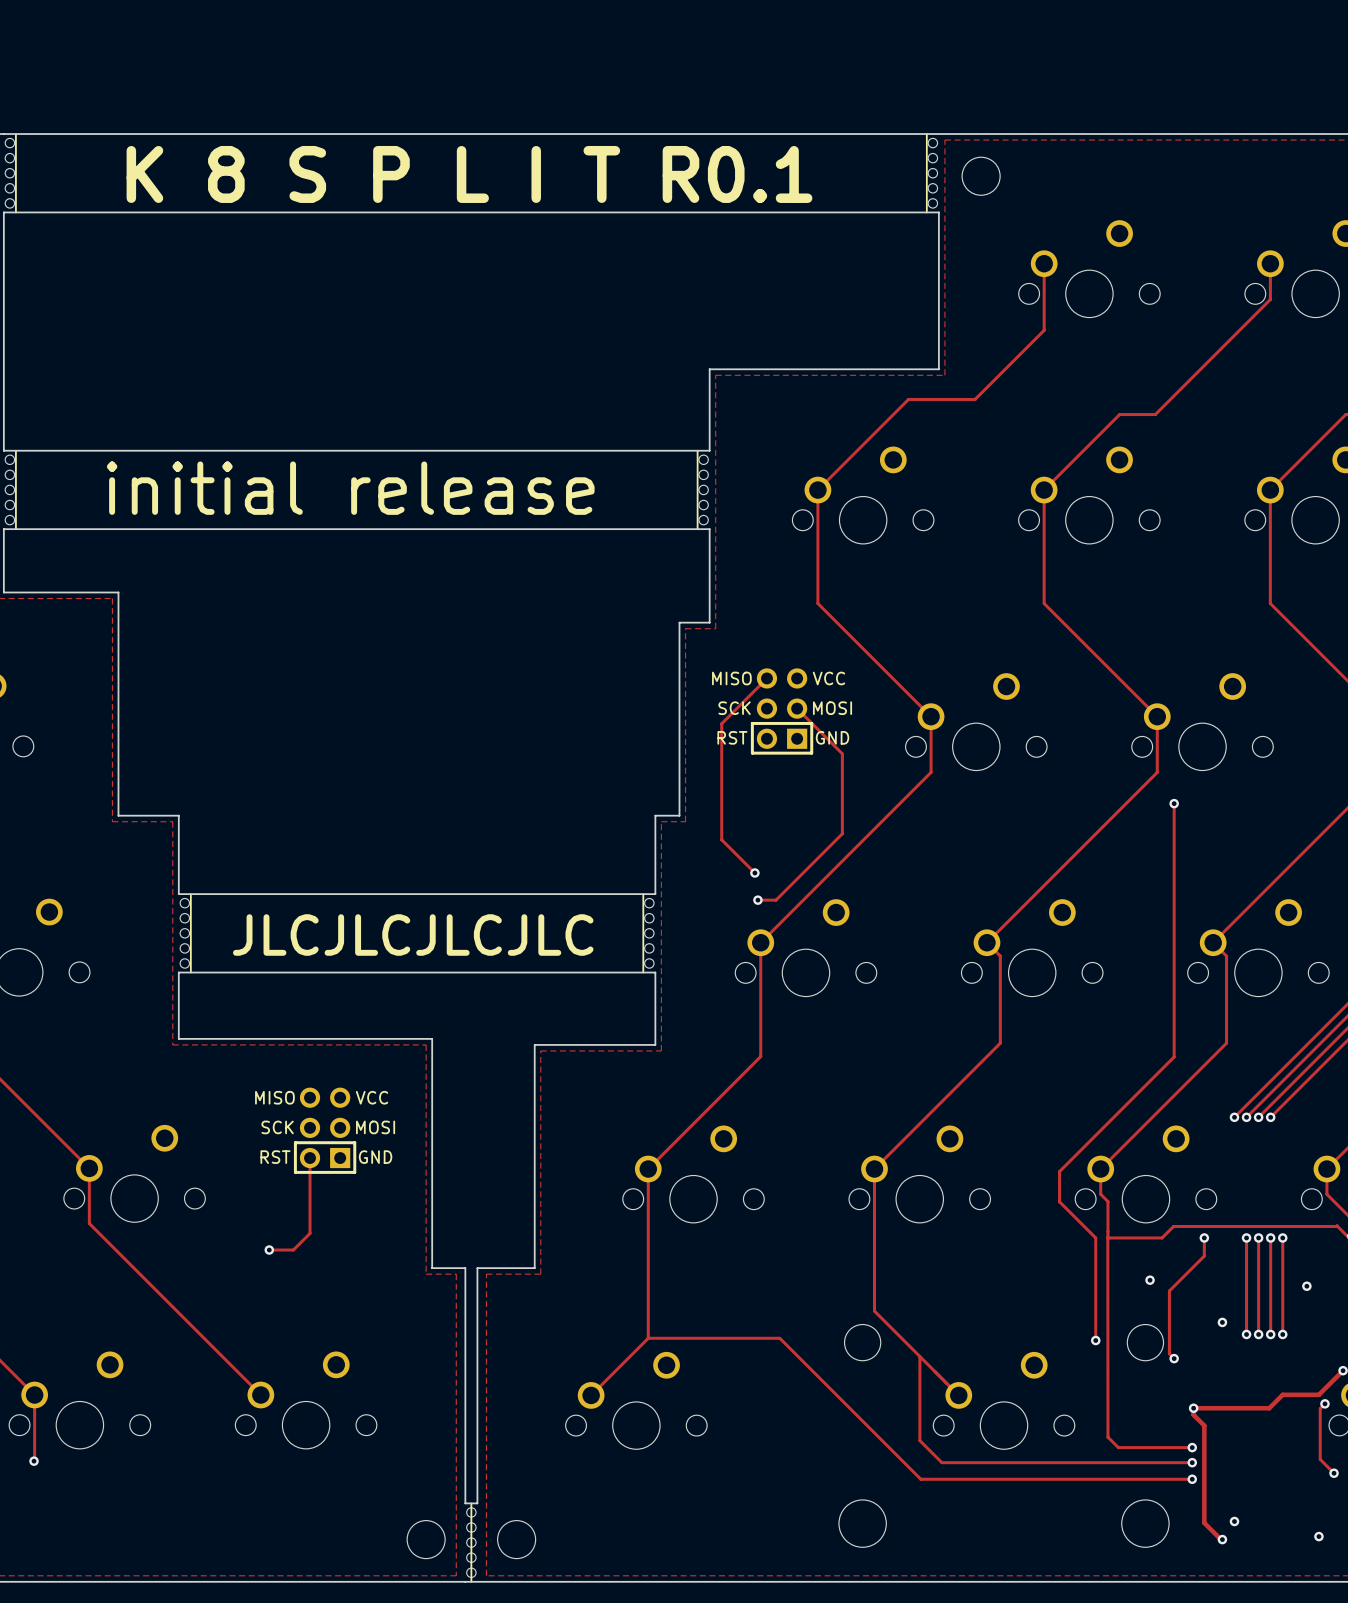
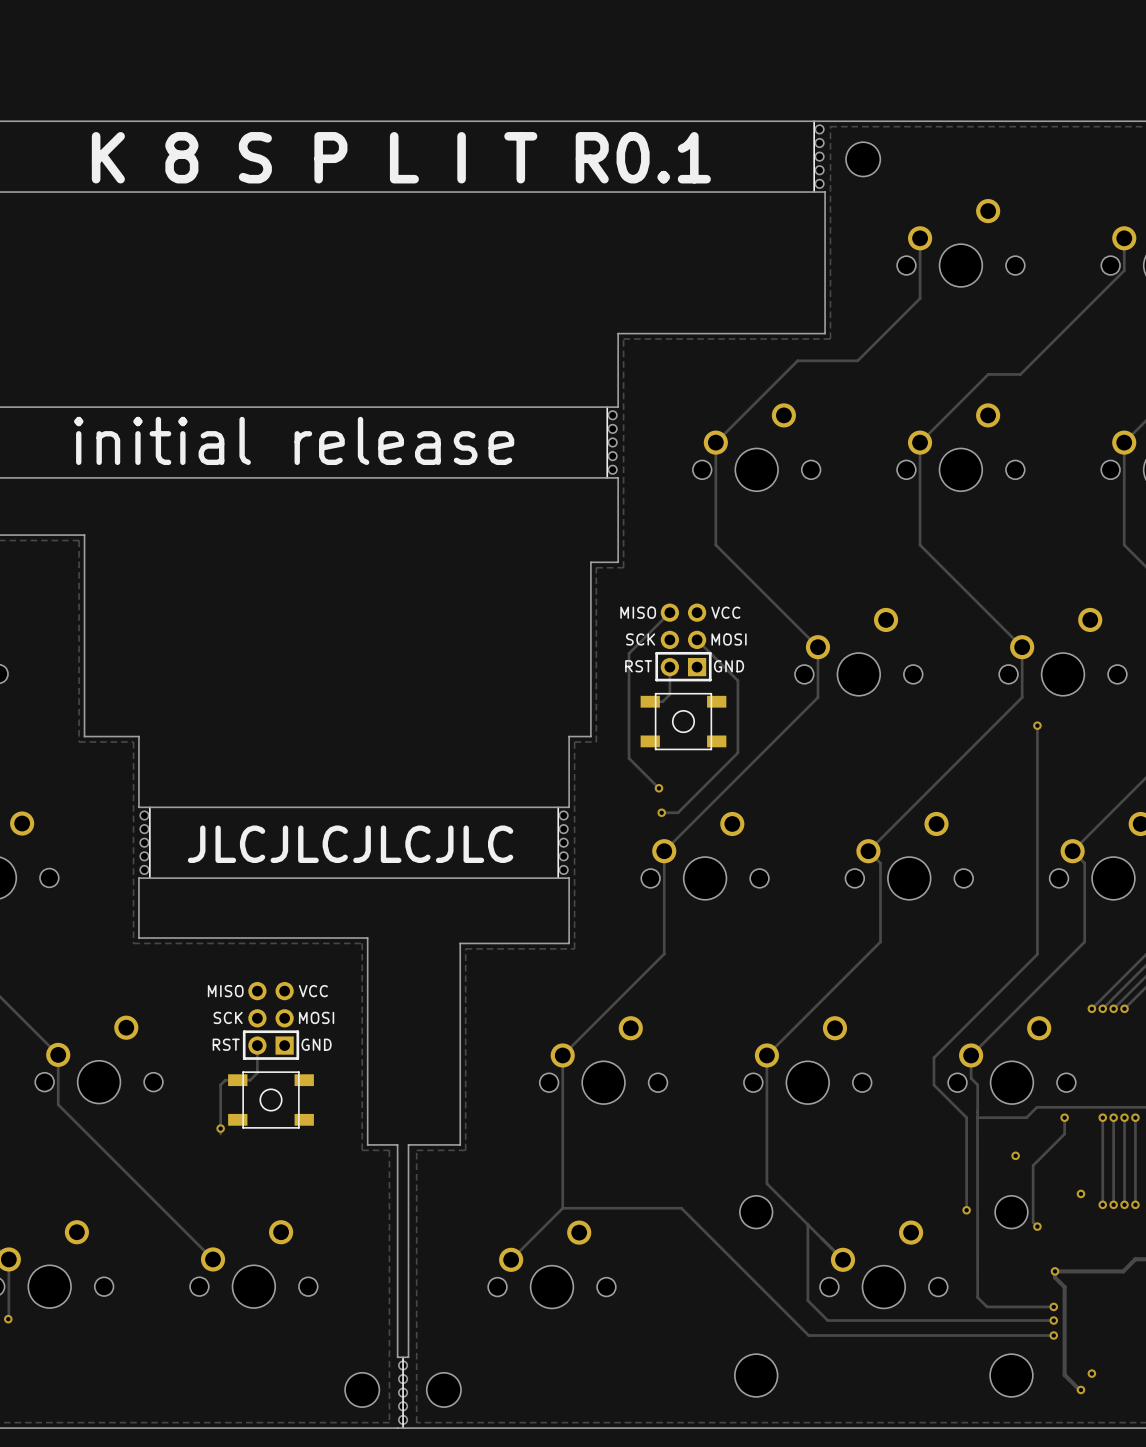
track: none -> (669, 667) (669, 694) (662, 701) (650, 701)
part: none -> (683, 721)
track: (310, 1188) (310, 1233) (293, 1250) (269, 1250) -> (257, 1072) (250, 1080) (225, 1080) (220, 1084) (220, 1134)
part: none -> (271, 1100)

